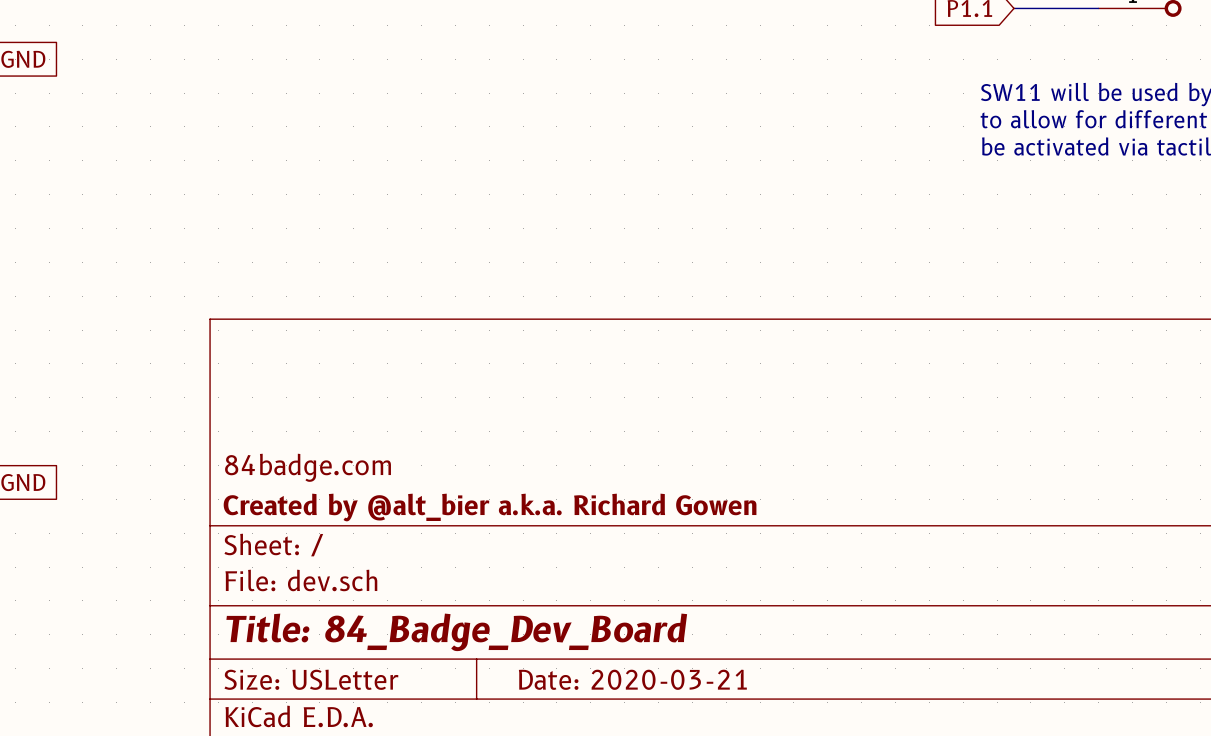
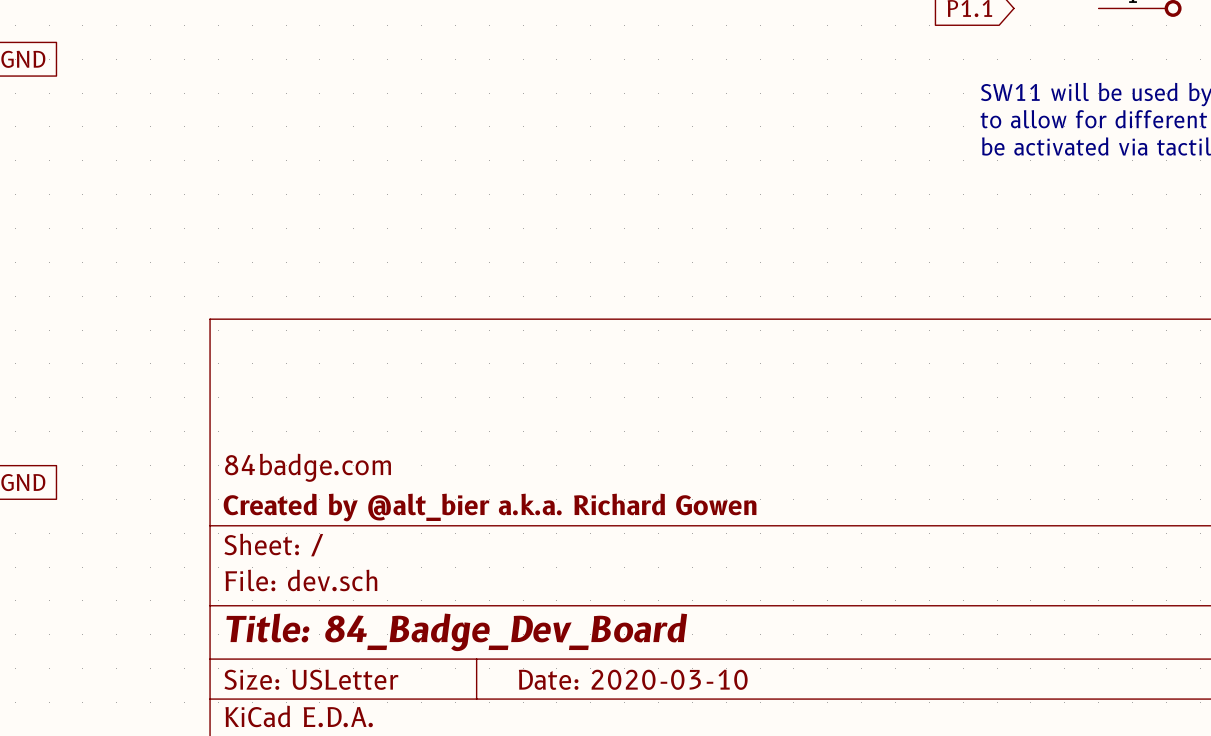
wire: (1013, 8) (1098, 8) -> none
title block: Date: 2020-03-21 (632, 679) -> Date: 2020-03-10 (633, 679)

